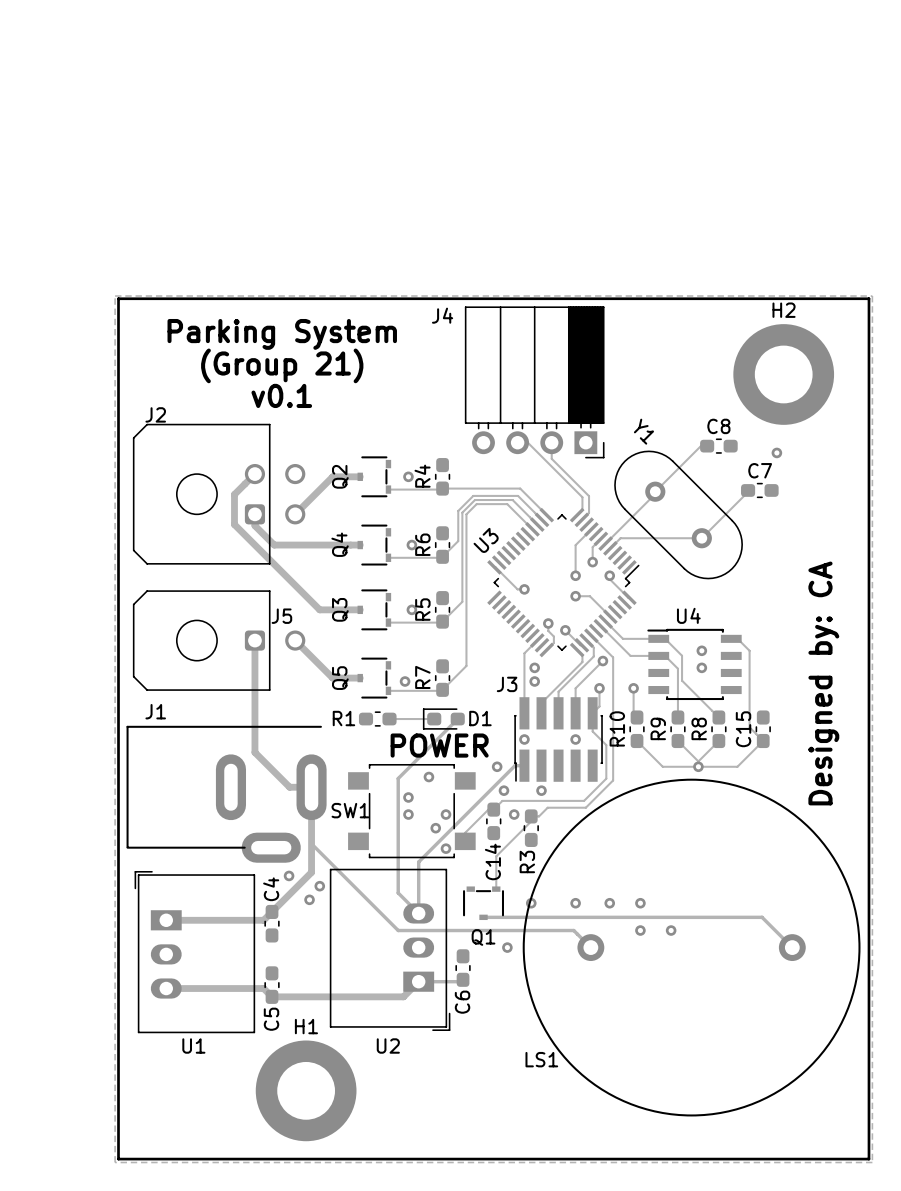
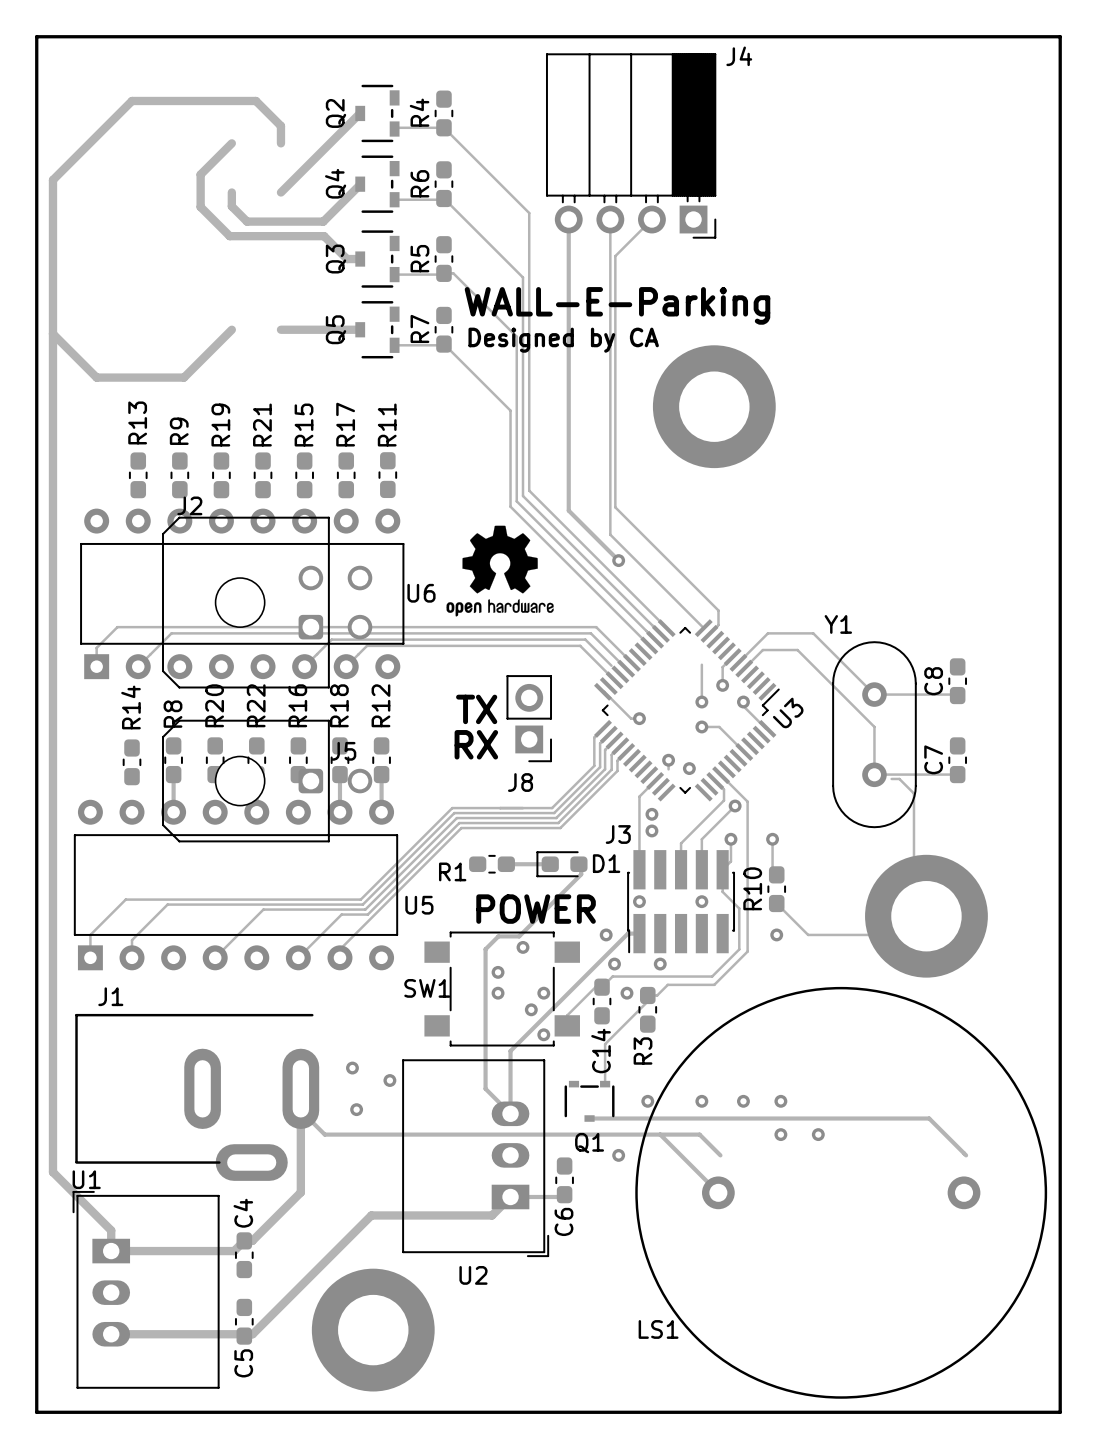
track: none -> (359, 113) (280, 192)
track: none -> (231, 143) (200, 174) (200, 207) (229, 236) (324, 236) (346, 259) (360, 259)
track: none -> (360, 184) (323, 221) (247, 221) (231, 206) (231, 192)
track: none -> (568, 219) (568, 510) (618, 560)
text: none -> WALL-E-Parking (617, 305)
track: none -> (231, 329) (184, 377) (96, 377) (52, 333)
track: none -> (280, 329) (360, 329)
text: none -> Designed by CA (563, 340)
zone outline: (115, 296) (115, 1162) (872, 1162) (872, 296) (115, 296) -> none
board edge: (118, 298) (868, 298) (868, 1159) (118, 1159) (118, 298) -> (36, 36) (36, 1412) (1060, 1412) (1060, 36) (36, 36)
J4 name position: J4 (442, 315) -> J4 (739, 56)
part: none -> (714, 406)
text: Parking System (282, 334) -> none
text: (Group 21) (282, 365) -> none
H2: (783, 374) -> none
J4 position: (534, 382) -> (631, 146)
R13: none -> (138, 475)
R19: none -> (221, 475)
R21: none -> (263, 475)
R15: none -> (304, 475)
R17: none -> (346, 475)
R11: none -> (387, 475)
text: v0.1 (281, 395) -> none
C8 name position: C8 (718, 426) -> C8 (933, 681)
drawing: none -> [446, 525, 554, 617]
track: (517, 442) (527, 442) (582, 497) (582, 509) (577, 515) -> (610, 219) (610, 534) (703, 628)
track: (551, 442) (551, 458) (589, 496) (589, 512) (581, 519) -> (651, 219) (615, 256) (615, 507) (718, 610) (718, 625) (709, 633)
track: (707, 446) (700, 446) (629, 519) -> (957, 695) (874, 694) (813, 633) (767, 633)
C8 rotation: 0° (718, 446) -> 90° clockwise (957, 681)
C8 position: (718, 446) -> (957, 681)
via: (776, 452) -> none
Q2 footprint: [357, 456, 392, 498] -> [355, 84, 400, 143]
via: none -> (618, 560)
C7 name position: C7 (760, 470) -> C7 (933, 759)
track: (254, 474) (234, 494) (234, 524) (319, 609) (360, 609) -> none
track: (360, 476) (332, 476) (295, 514) -> none
via: (408, 476) -> none
R4 position: (442, 476) -> (443, 113)
U6: none -> (242, 593)
track: (520, 488) (388, 489) -> (634, 595) (529, 490) (529, 213) (443, 127) (394, 129)
track: (748, 490) (701, 538) (620, 538) -> (874, 774) (874, 726) (797, 650) (762, 650) (756, 656)
C7 rotation: 0° (759, 490) -> 90° clockwise (957, 760)
C7 position: (759, 490) -> (957, 760)
track: (518, 495) (473, 495) (458, 510) (458, 541) (441, 557) (388, 557) -> (631, 604) (523, 496) (523, 277) (443, 198) (394, 199)
track: (512, 500) (474, 500) (462, 512) (462, 601) (441, 622) (388, 622) -> (625, 609) (516, 501) (516, 336) (453, 273) (394, 274)
track: (507, 504) (476, 504) (466, 514) (466, 665) (441, 690) (388, 690) -> (618, 614) (510, 506) (510, 410) (443, 344) (394, 345)
track: (254, 514) (254, 525) (274, 545) (360, 545) -> none
Y1 rotation: 0° (678, 514) -> 45° clockwise (874, 734)
Y1 position: (678, 514) -> (874, 734)
Q4 footprint: [357, 524, 392, 566] -> [355, 155, 400, 213]
track: (591, 529) (575, 545) -> none
U3 name position: U3 (486, 540) -> U3 (788, 712)
track: none -> (631, 662) (596, 627) (117, 627) (96, 647) (96, 666)
via: (411, 545) -> none
R6 position: (442, 545) -> (443, 184)
track: none -> (138, 666) (171, 633) (590, 633) (626, 668)
track: none -> (346, 666) (367, 645) (580, 645) (614, 680)
track: none -> (611, 665) (585, 639) (331, 639) (304, 666)
text: none -> TX (476, 709)
Q3 footprint: [357, 589, 392, 631] -> [355, 230, 400, 288]
J8: none -> (529, 718)
track: none -> (602, 728) (594, 737) (594, 765) (552, 808) (452, 808) (360, 899) (125, 899) (90, 934) (90, 957)
track: none -> (608, 734) (600, 743) (600, 767) (554, 813) (454, 813) (362, 904) (167, 904) (132, 940) (132, 957)
track: none -> (614, 740) (605, 749) (605, 769) (556, 818) (456, 818) (365, 909) (263, 909) (215, 957)
via: (411, 609) -> none
R5 position: (442, 609) -> (443, 259)
text: none -> RX (476, 744)
track: none -> (620, 746) (611, 754) (611, 769) (558, 823) (459, 823) (367, 914) (341, 914) (298, 957)
track: none -> (626, 752) (617, 760) (617, 770) (560, 828) (461, 828) (339, 949) (339, 957)
track: (605, 621) (623, 638) (665, 638) (682, 655) (682, 680) (718, 717) -> none
R20: none -> (215, 760)
R22: none -> (256, 760)
R16: none -> (298, 760)
R18: none -> (339, 760)
R12: none -> (381, 760)
R14: none -> (132, 762)
track: (600, 626) (630, 655) (665, 655) (677, 668) (677, 717) -> none
track: (548, 630) (553, 636) (553, 642) (546, 650) -> none
track: (565, 630) (581, 645) -> none
track: none -> (173, 774) (173, 812)
track: none -> (381, 774) (381, 812)
track: none -> (874, 774) (957, 774)
track: (254, 640) (254, 752) (289, 787) (311, 787) -> none
track: (295, 640) (332, 678) (360, 678) -> none
track: none -> (339, 784) (339, 774) (339, 812)
track: (577, 650) (582, 655) (582, 662) (541, 703) -> none
via: (701, 650) -> none
Q5 footprint: [357, 657, 392, 699] -> [355, 301, 400, 359]
U4: (694, 664) -> none
via: (701, 667) -> none
R7 position: (442, 678) -> (443, 329)
via: (405, 681) -> none
text: Designed by: CA (823, 683) -> none
track: none -> (506, 864) (550, 864)
R1 name position: R1 (343, 718) -> R1 (452, 871)
R1 position: (377, 719) -> (492, 864)
track: (389, 719) (434, 719) -> none
D1 position: (443, 719) -> (561, 864)
track: (457, 719) (408, 767) -> (578, 864) (581, 866) (581, 874) (519, 936) (498, 936)
U5: none -> (236, 885)
R9 name position: R9 (658, 728) -> R9 (179, 431)
R8 name position: R8 (699, 728) -> R8 (172, 714)
R9 position: (677, 729) -> (179, 475)
R8 position: (718, 729) -> (173, 760)
C15: (763, 729) -> none
track: (677, 741) (698, 761) -> none
track: (718, 741) (698, 761) -> none
part: none -> (926, 916)
via: none -> (776, 934)
via: (698, 766) -> none
track: (311, 787) (311, 843) (398, 930) -> (280, 143) (280, 125) (255, 100) (132, 100) (52, 180) (52, 1172) (111, 1230) (111, 1251) (234, 1251) (244, 1240) (252, 1240) (300, 1192) (300, 1088) (300, 1110) (324, 1134) (485, 1134)
track: (311, 787) (311, 872) (263, 920) (166, 920) -> none
J1 position: (226, 794) -> (197, 1097)
via position: (309, 899) -> (356, 1109)
C4 position: (272, 923) -> (244, 1255)
track: none -> (660, 1134) (718, 1192)
LS1 position: (691, 947) -> (841, 1192)
U1 position: (194, 952) -> (146, 1289)
C5 position: (272, 985) -> (244, 1321)
track: (166, 988) (263, 988) (272, 996) (304, 996) -> (111, 1334) (252, 1334) (371, 1215)
H1 name: H1 (306, 1026) -> none
U1 name position: U1 (193, 1046) -> U1 (86, 1179)

